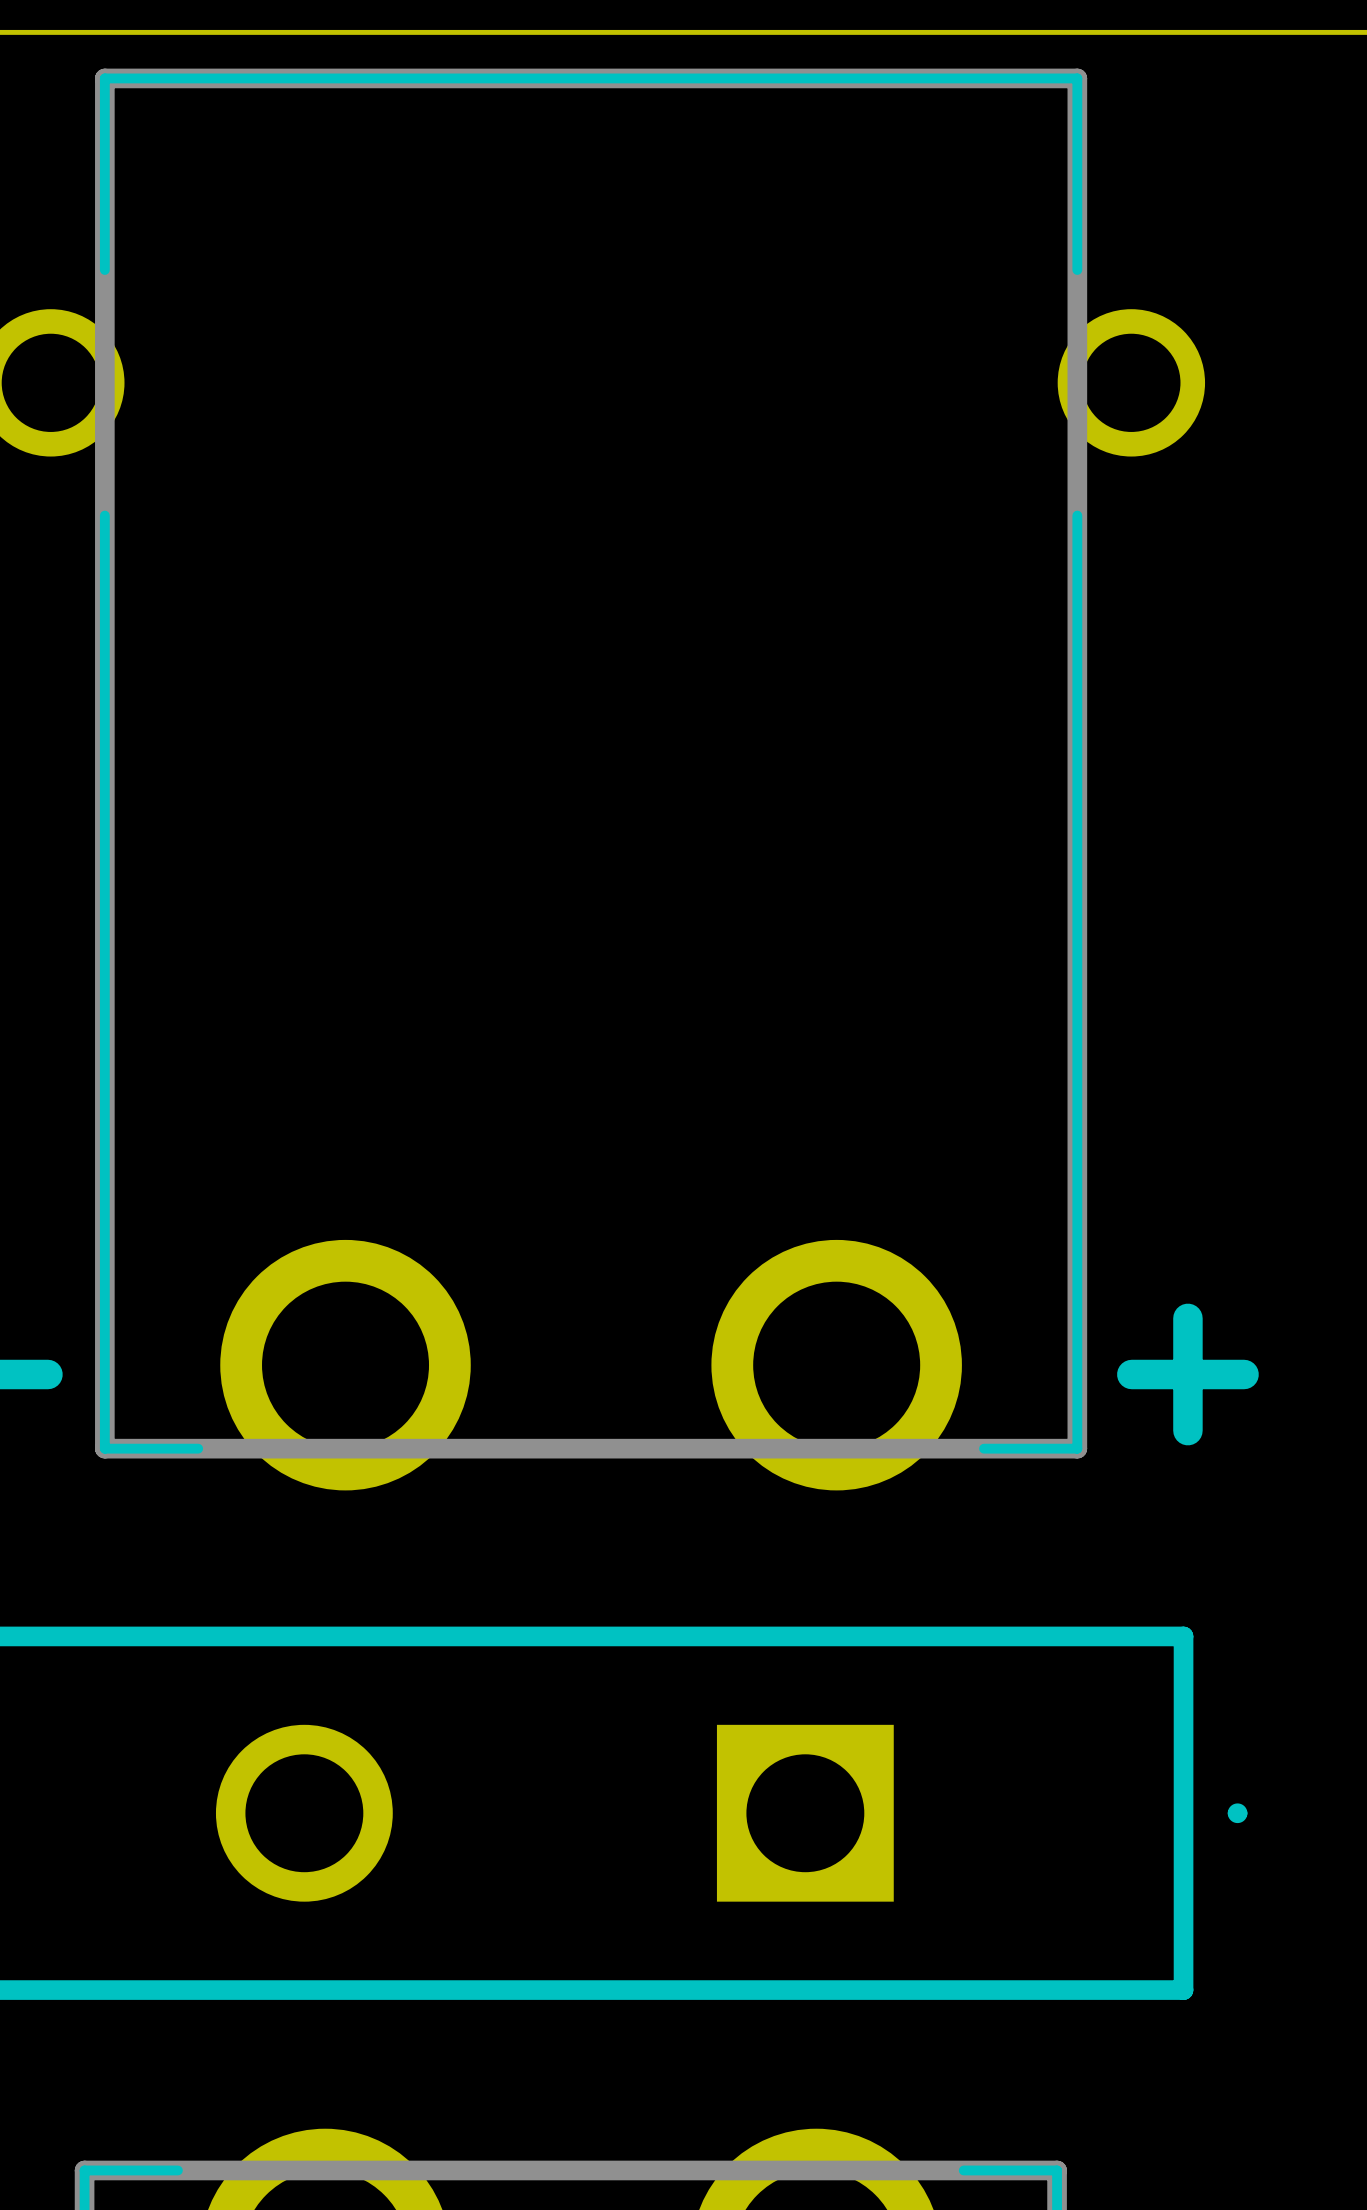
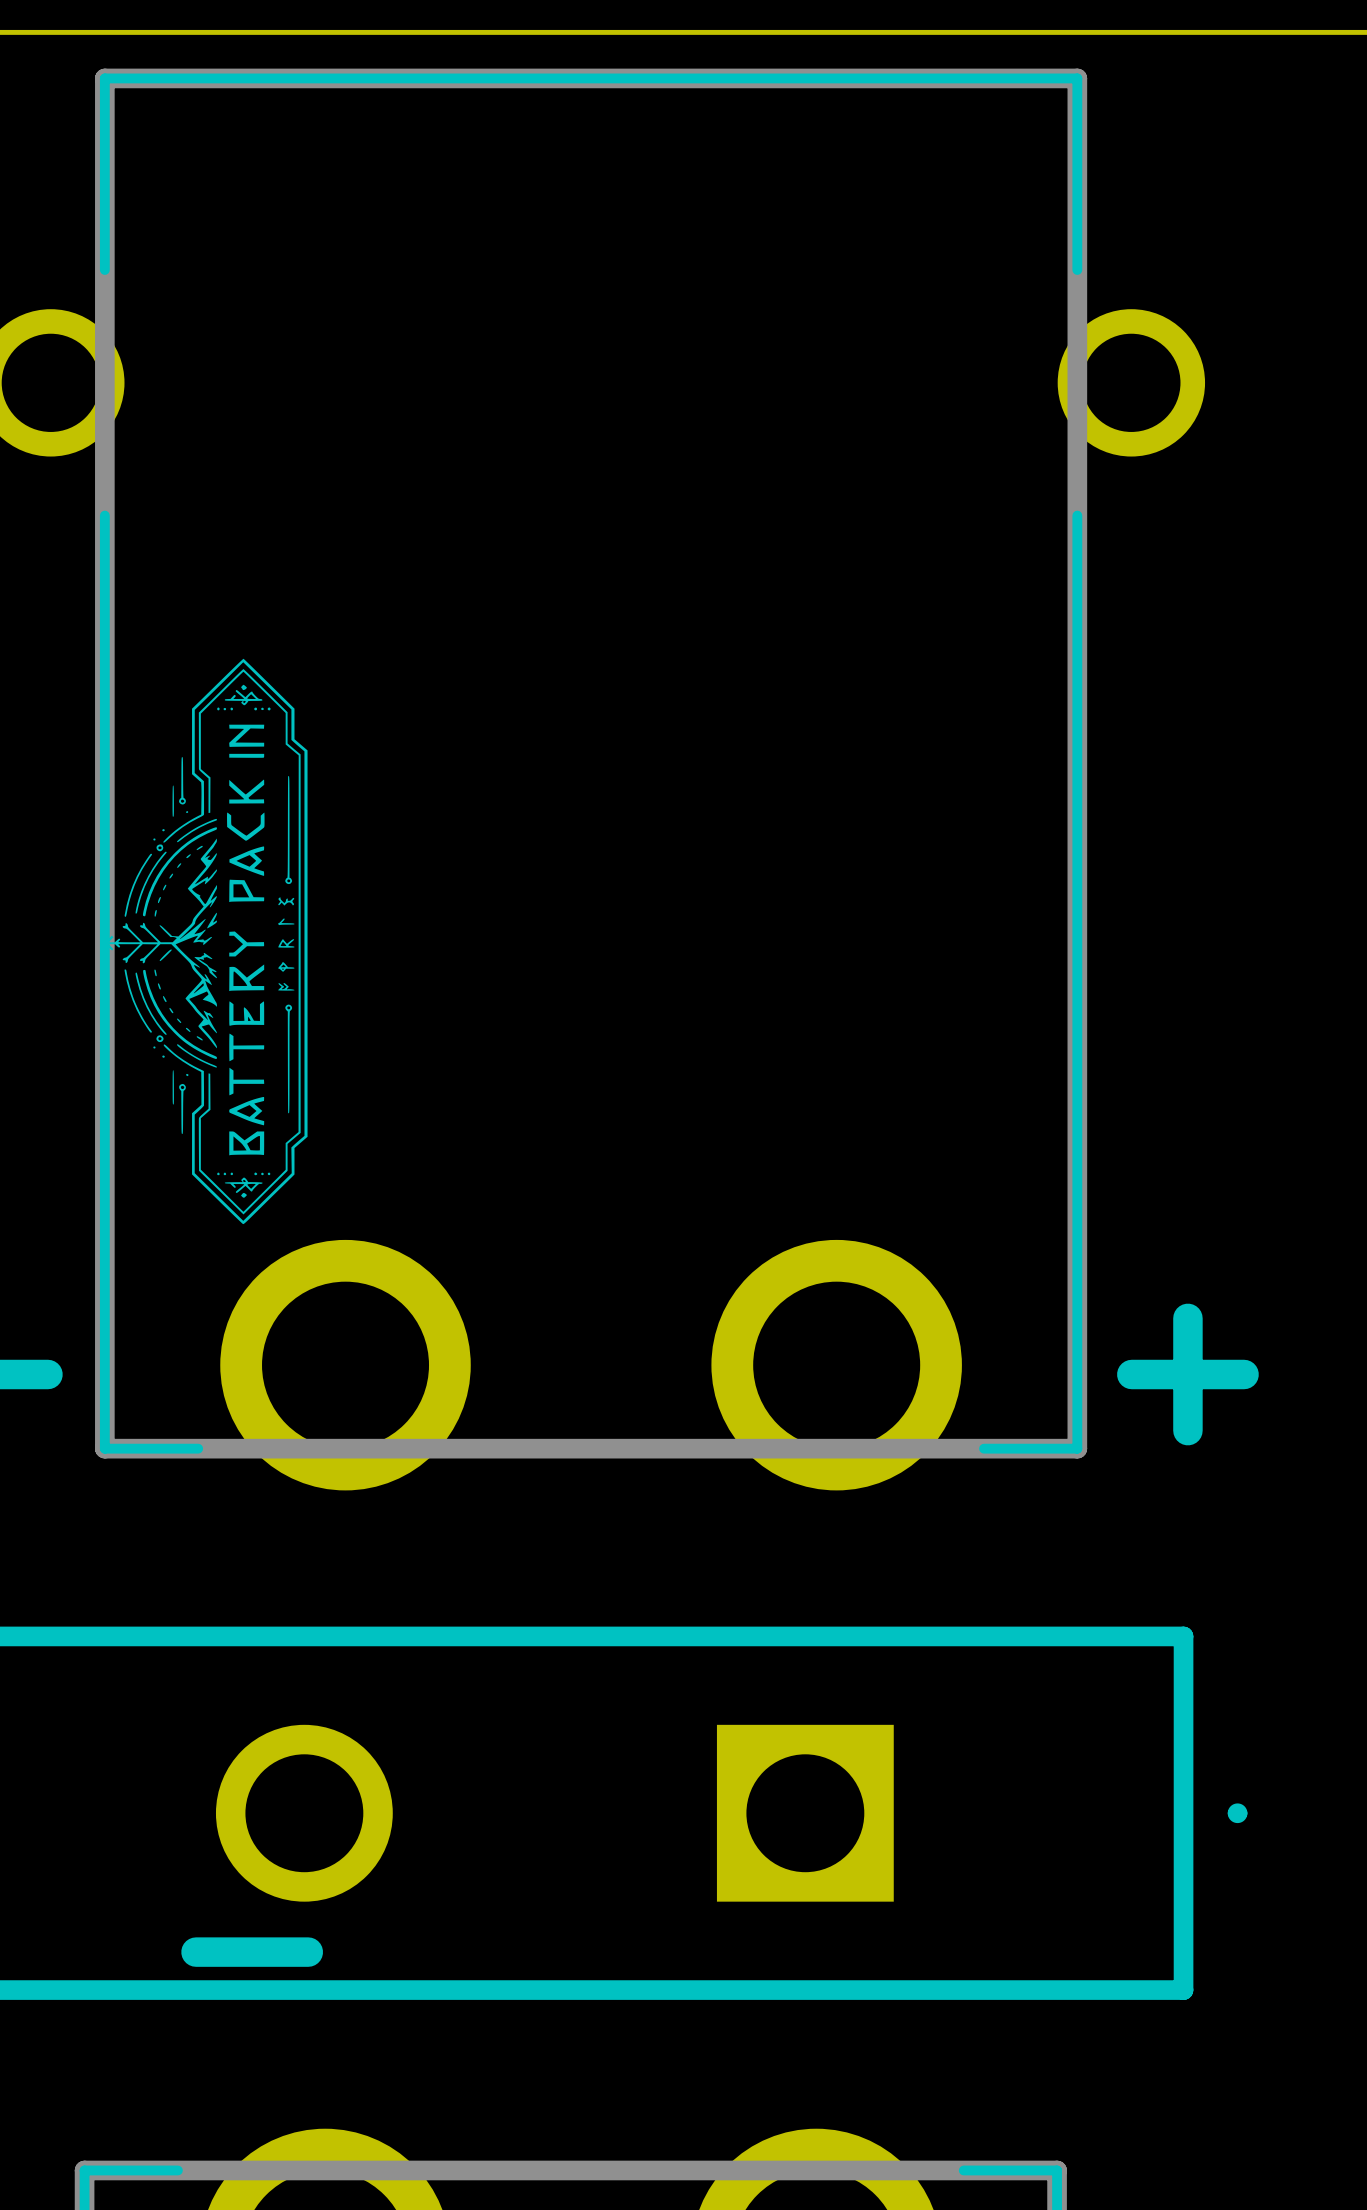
drawing: none -> [104, 658, 308, 1225]
text: none -> - (252, 1952)

